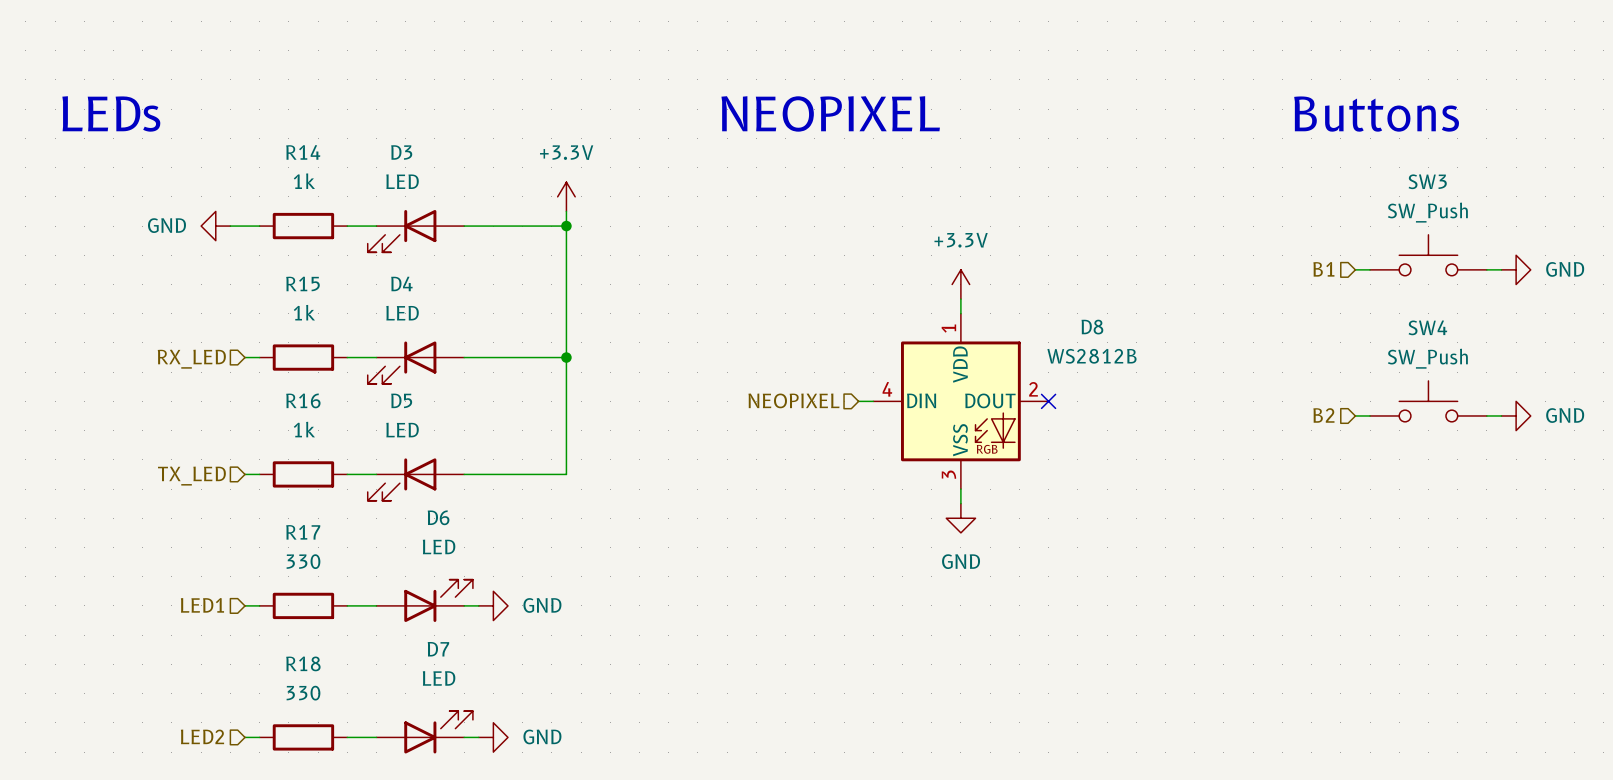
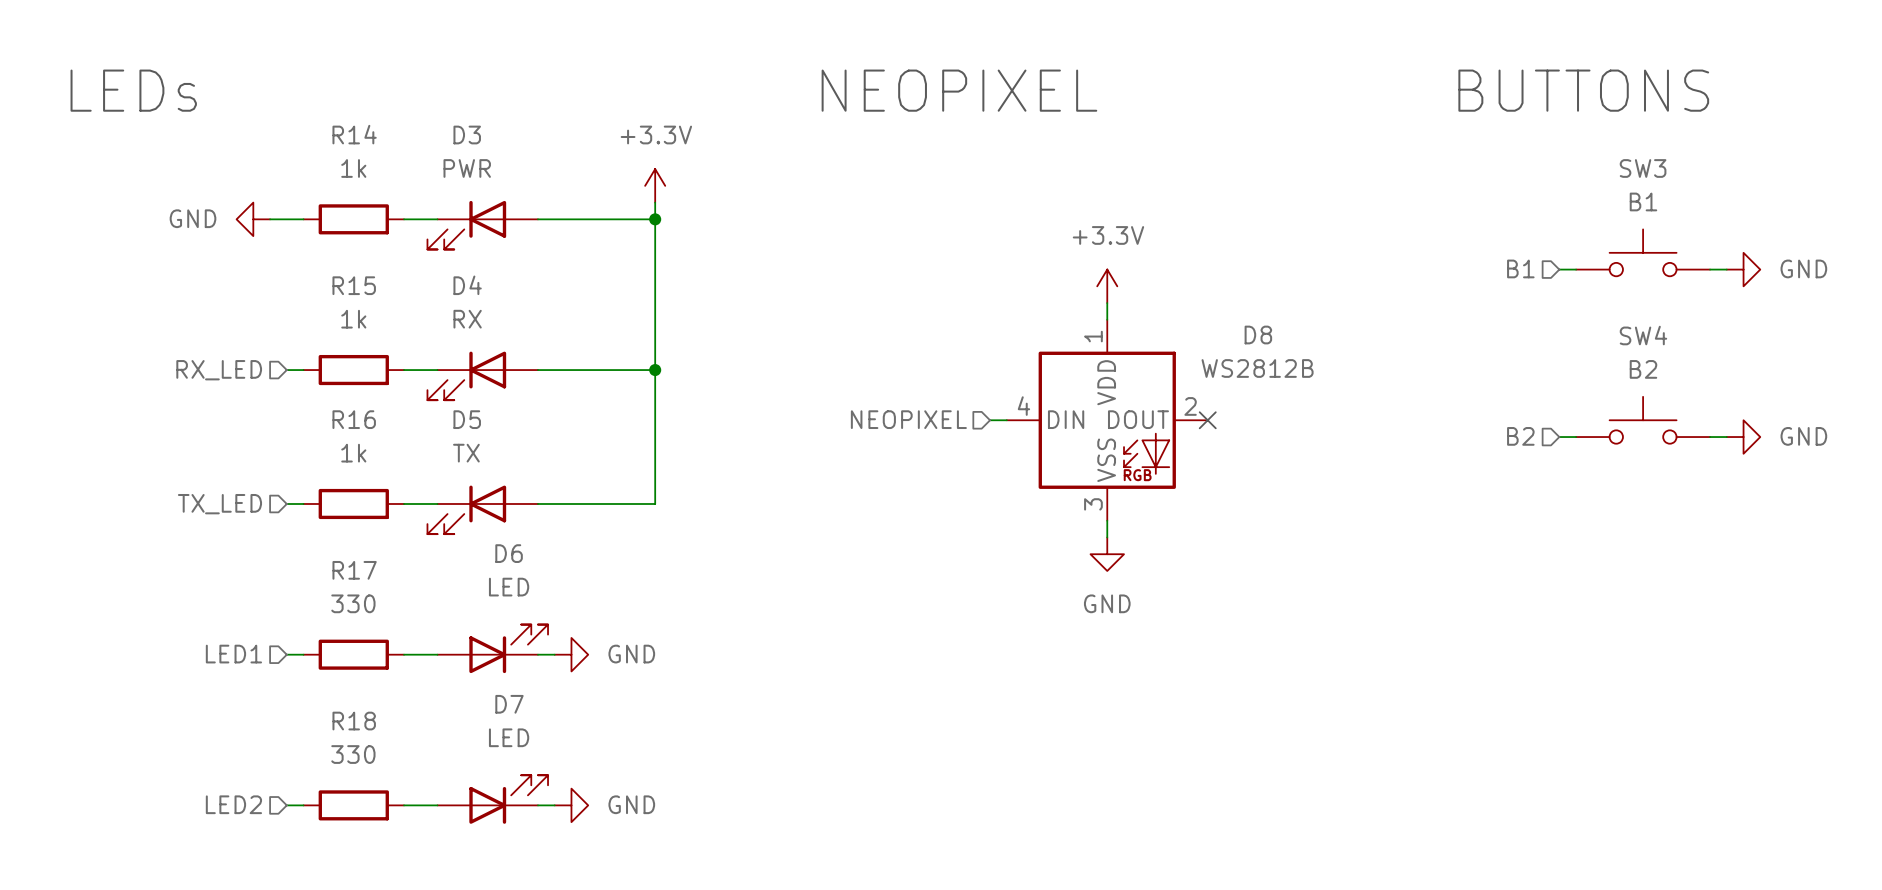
text: Buttons (1376, 114) -> BUTTONS (1583, 90)
D3 value: LED (402, 181) -> PWR (467, 168)
SW3 value: SW_Push (1427, 212) -> B1 (1643, 201)
D4 value: LED (402, 313) -> RX (467, 319)
SW4 value: SW_Push (1427, 358) -> B2 (1643, 369)
D5 value: LED (402, 430) -> TX (466, 453)

